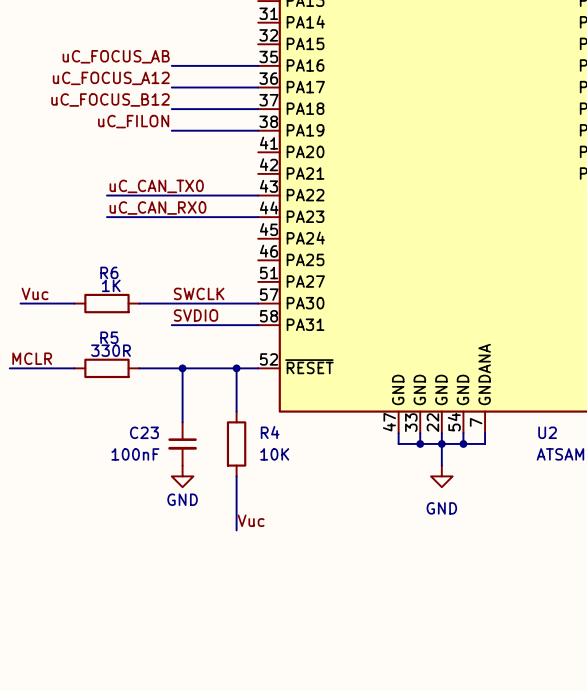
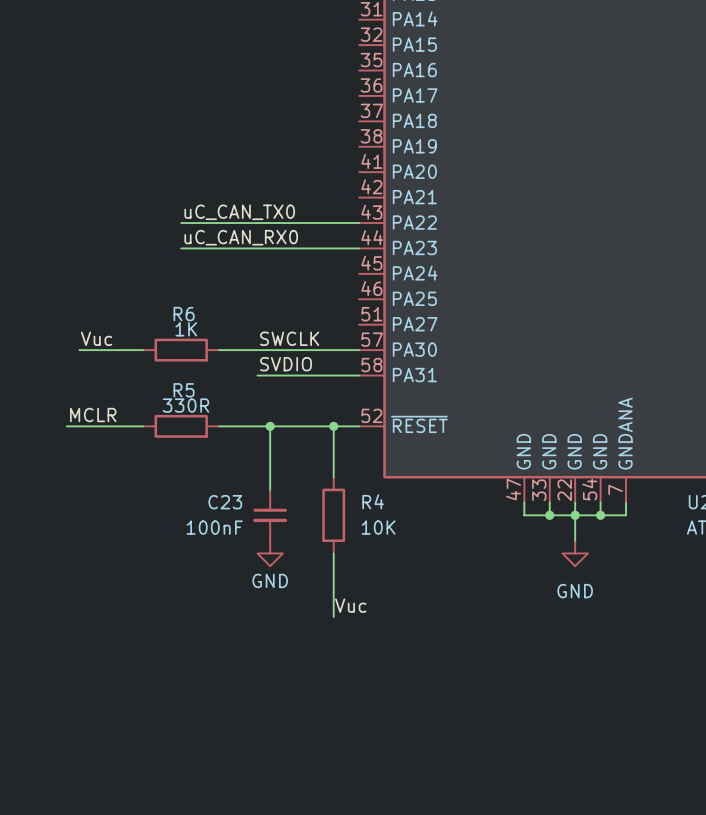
label: uC_FOCUS_AB (116, 56) -> none
wire: (171, 65) (258, 65) -> none
label: uC_FOCUS_A12 (111, 78) -> none
wire: (171, 87) (258, 87) -> none
label: uC_FOCUS_B12 (110, 99) -> none
wire: (171, 109) (258, 109) -> none
label: uC_FILON (133, 121) -> none
wire: (171, 130) (258, 130) -> none

